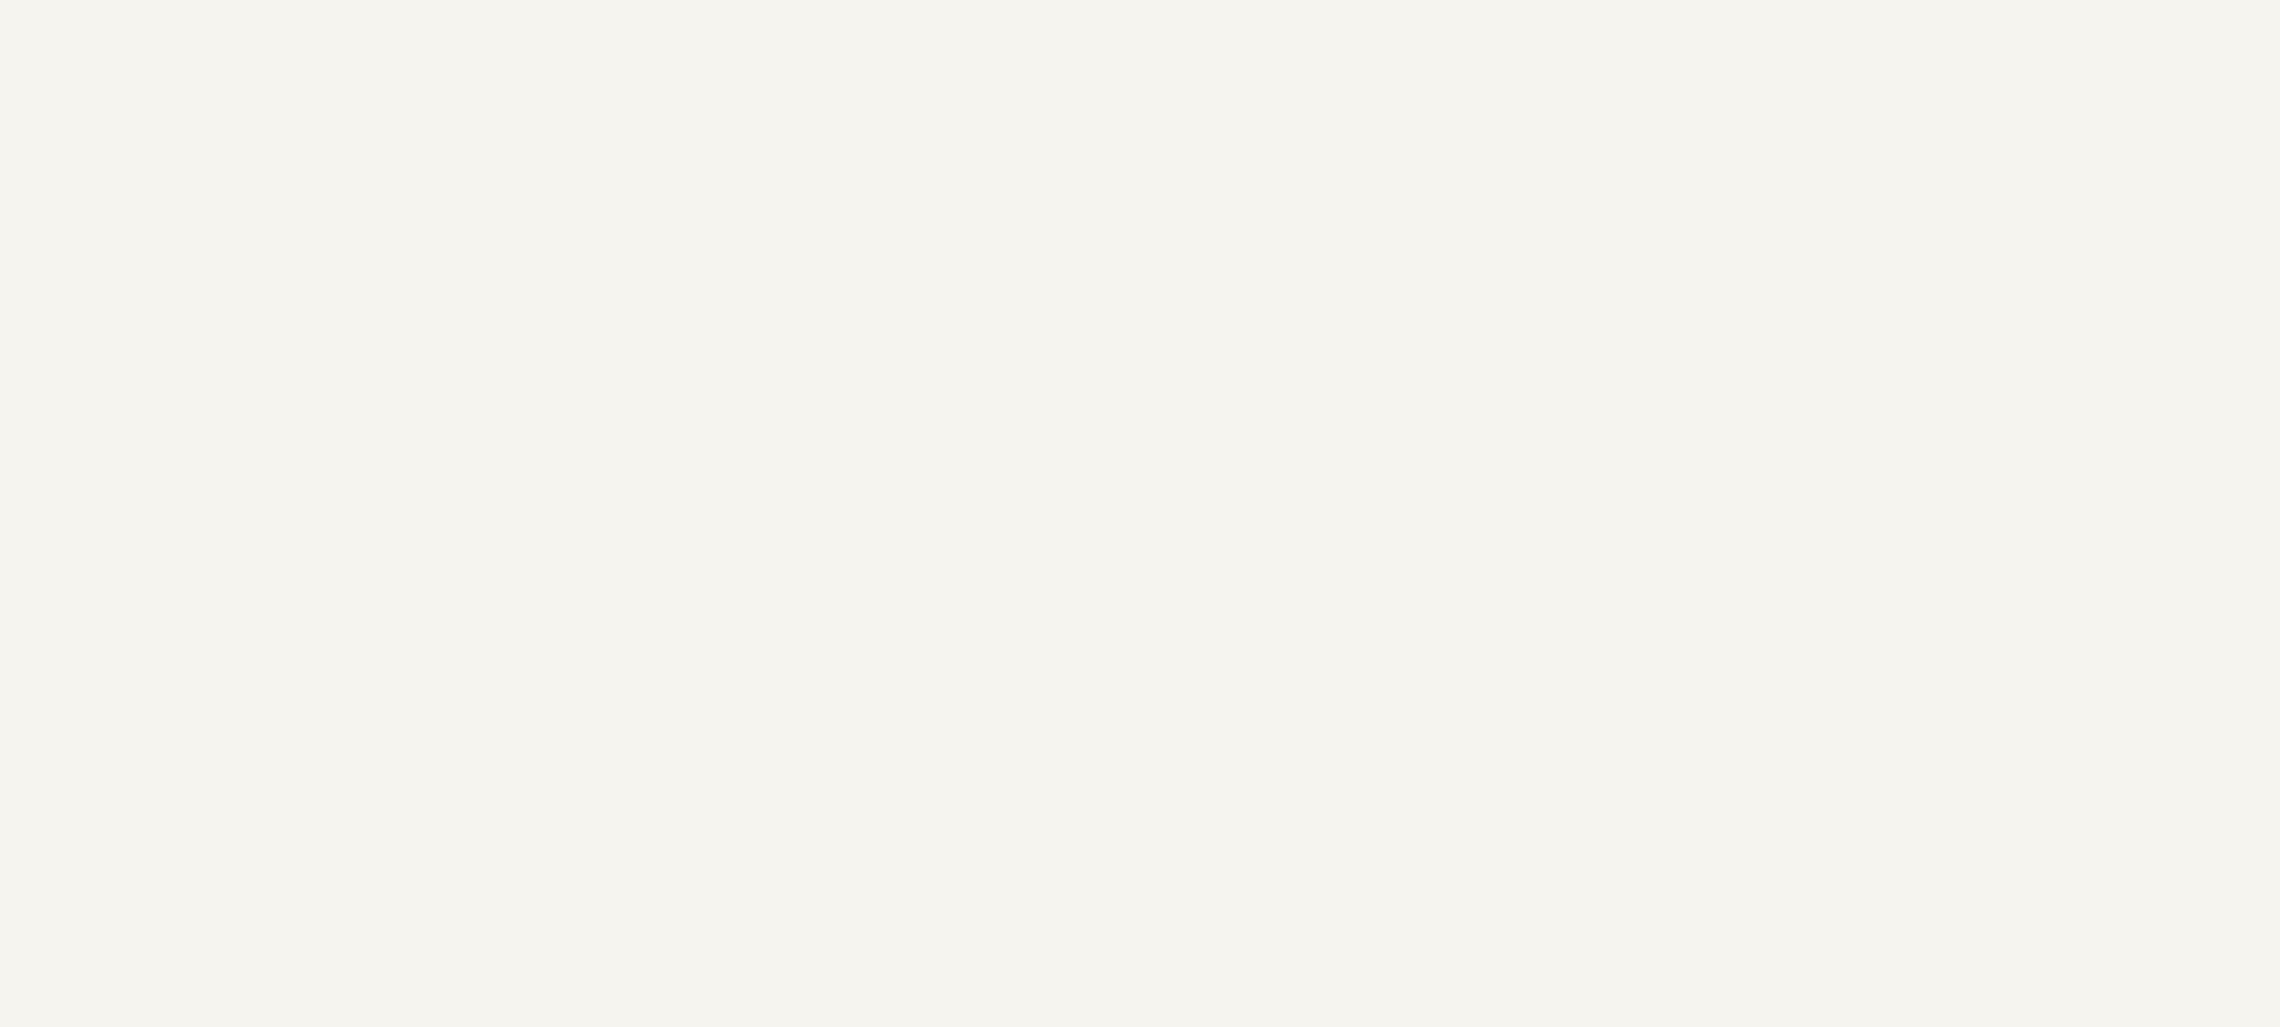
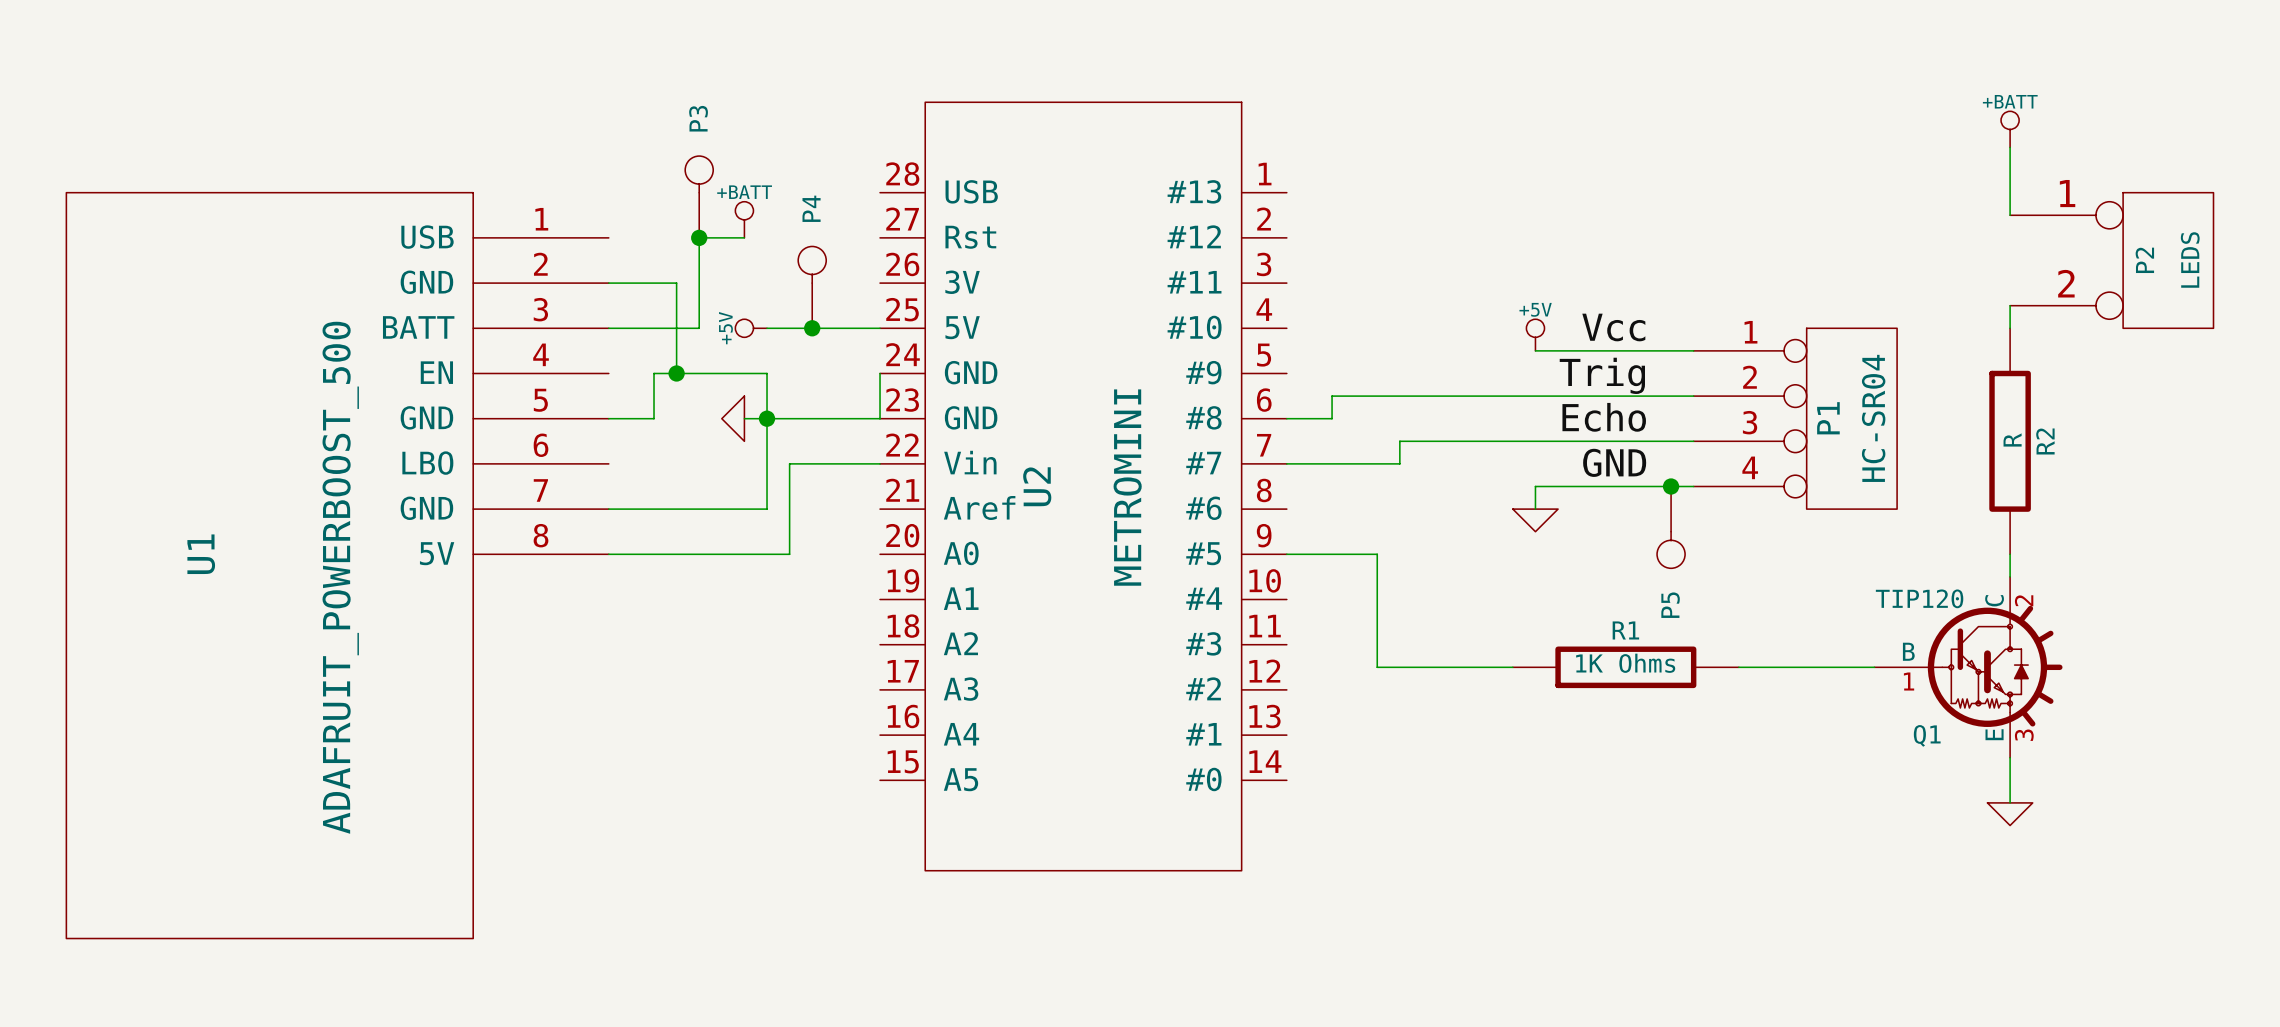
power symbol: none -> +BATT (2010, 129)
wire: none -> (2010, 147) (2010, 215)
P3: none -> (699, 196)
power symbol: none -> +BATT (744, 219)
junction: none -> (699, 237)
wire: none -> (744, 237) (699, 237) (699, 328) (608, 328)
P2: none -> LEDS (2111, 260)
wire: none -> (608, 283) (676, 283) (676, 373)
P4: none -> (812, 287)
wire: none -> (2010, 305) (2010, 328)
label: none -> Vcc (1613, 327)
power symbol: none -> +5V (751, 328)
wire: none -> (767, 328) (880, 328)
junction: none -> (812, 328)
power symbol: none -> +5V (1535, 335)
wire: none -> (1535, 350) (1693, 350)
junction: none -> (676, 373)
wire: none -> (880, 373) (880, 418) (744, 418)
label: none -> Trig (1602, 375)
wire: none -> (1693, 396) (1332, 396) (1332, 418) (1286, 418)
label: none -> Echo (1604, 417)
wire: none -> (608, 418) (654, 418) (654, 373) (767, 373) (767, 509) (608, 509)
power symbol: none -> (733, 418)
junction: none -> (767, 418)
P1: none -> HC-SR04 (1795, 418)
wire: none -> (1693, 441) (1399, 441) (1399, 463) (1286, 463)
R2: none -> R (2010, 441)
label: none -> GND (1614, 462)
wire: none -> (880, 463) (789, 463) (789, 554) (608, 554)
U2: none -> METROMINI (1083, 486)
junction: none -> (1671, 486)
wire: none -> (1693, 486) (1535, 486) (1535, 509)
power symbol: none -> (1535, 520)
P5: none -> (1671, 527)
wire: none -> (1286, 554) (1377, 554) (1377, 667) (1512, 667)
wire: none -> (2010, 554) (2010, 576)
U1: none -> ADAFRUIT_POWERBOOST_500 (337, 565)
R1: none -> 1K Ohms (1625, 667)
wire: none -> (1738, 667) (1874, 667)
Q1: none -> TIP120 (1968, 667)
wire: none -> (2010, 757) (2010, 802)
power symbol: none -> (2010, 814)

